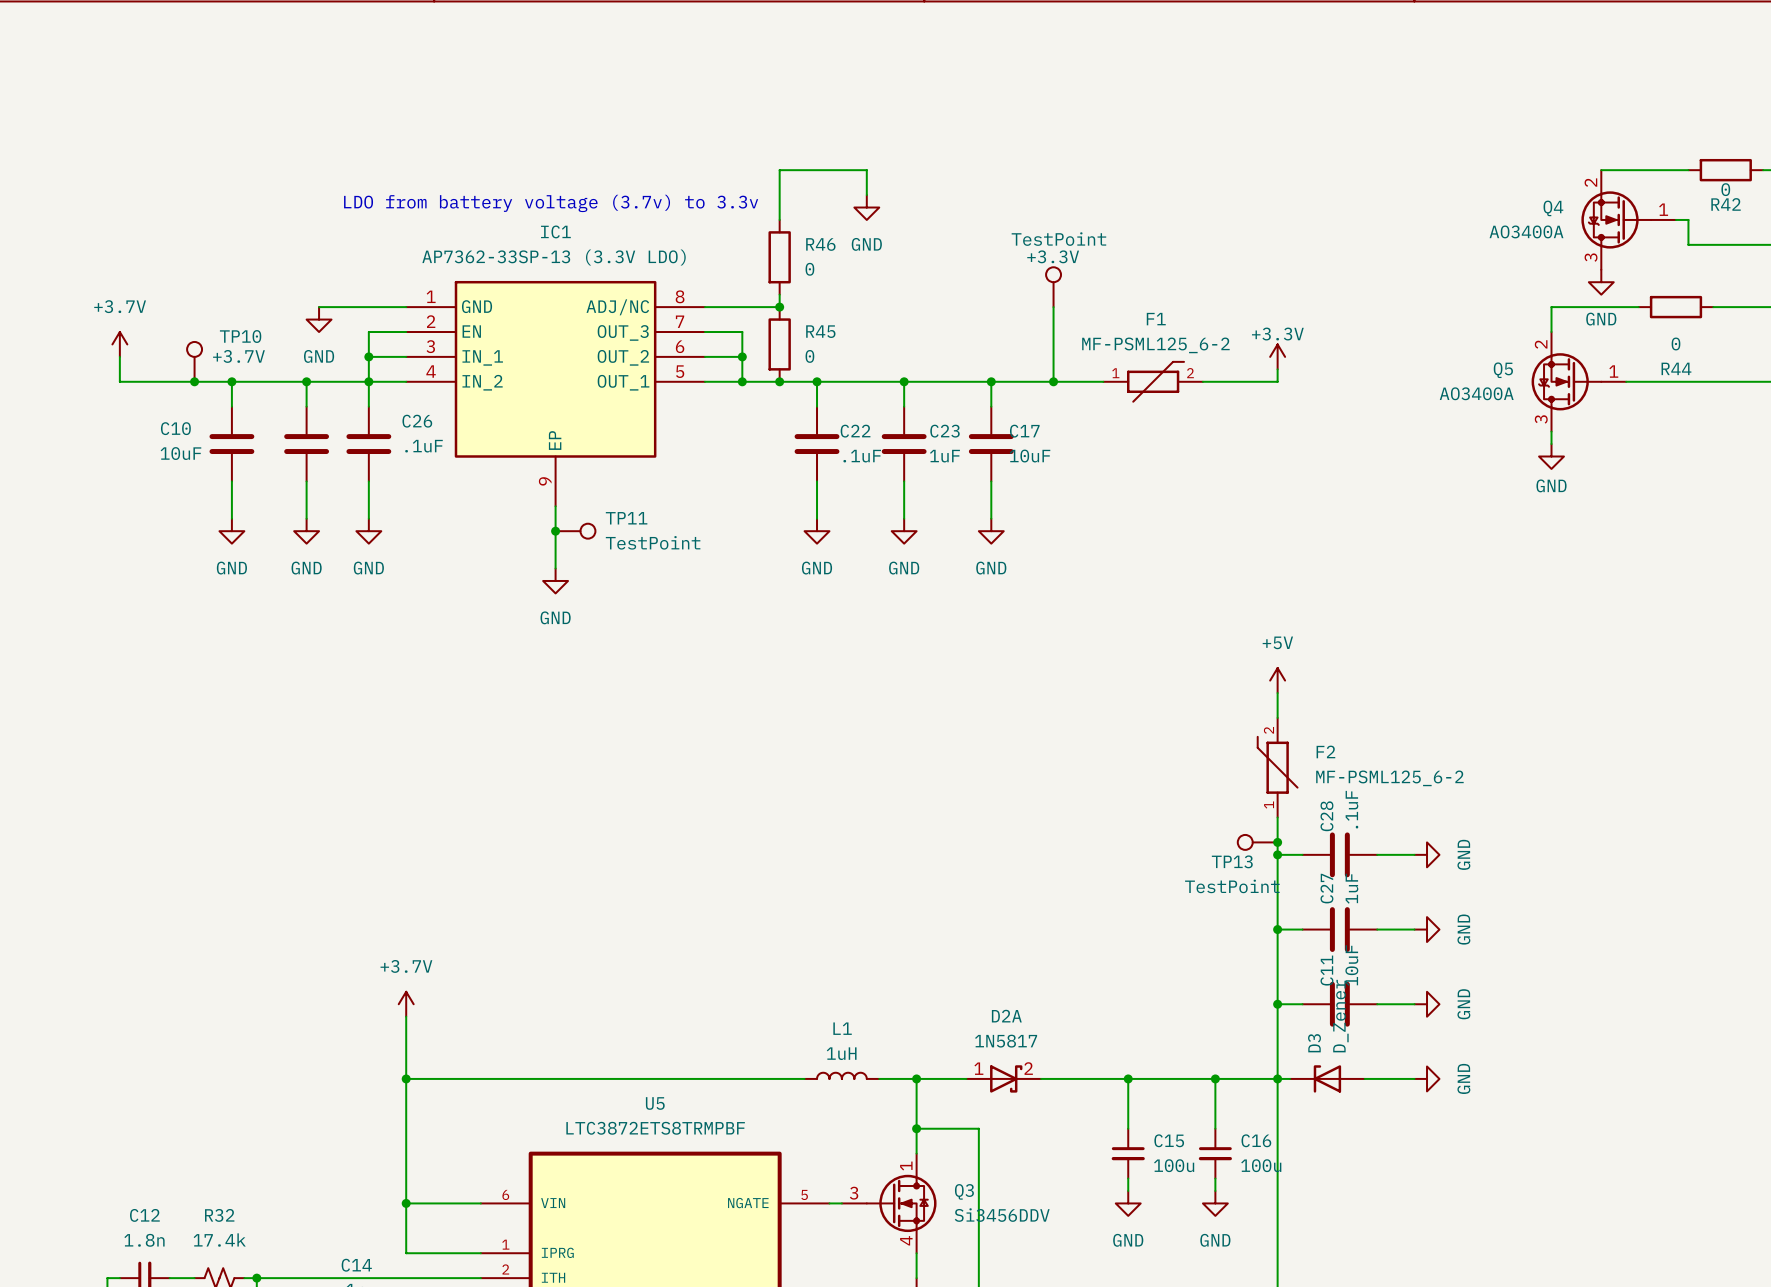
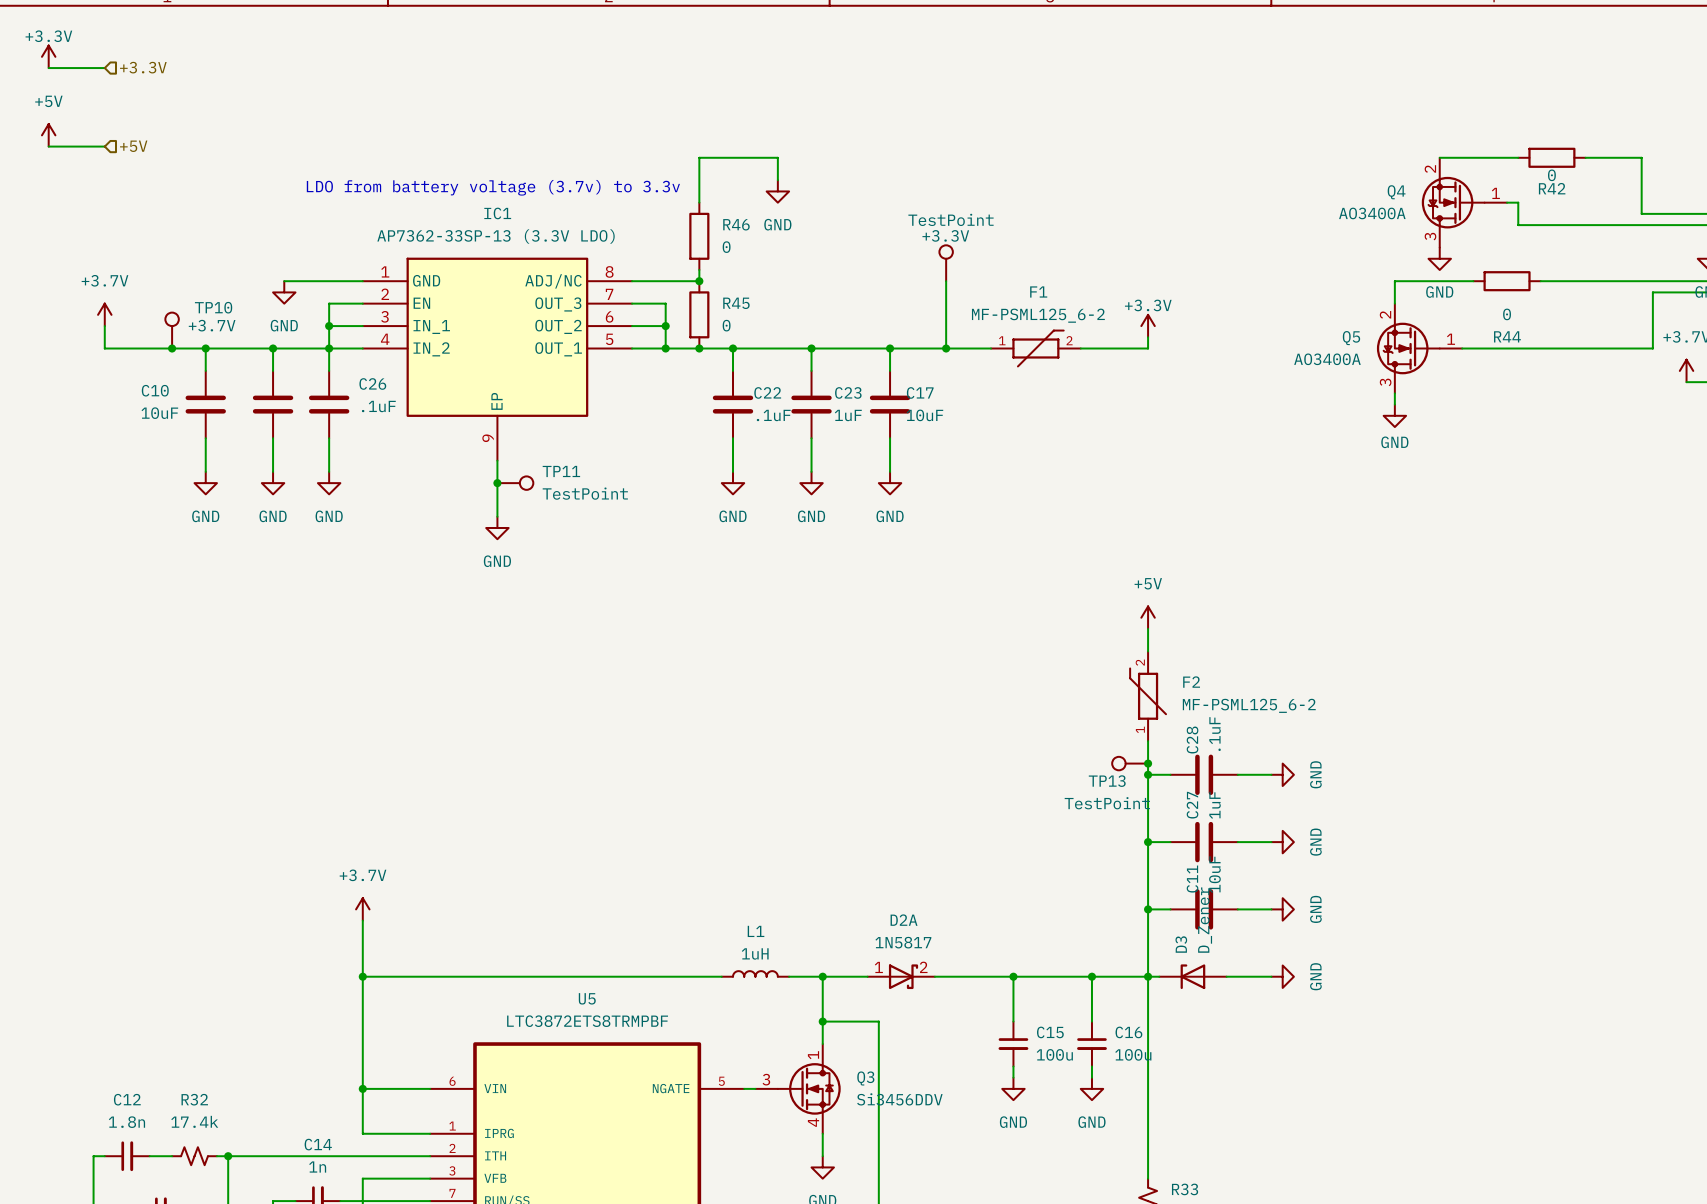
power symbol: none -> +3.3V (48, 56)
wire: none -> (48, 68) (104, 68)
hierarchical label: none -> +3.3V (143, 67)
power symbol: none -> +5V (48, 135)
wire: none -> (48, 146) (104, 146)
hierarchical label: none -> +5V (133, 146)

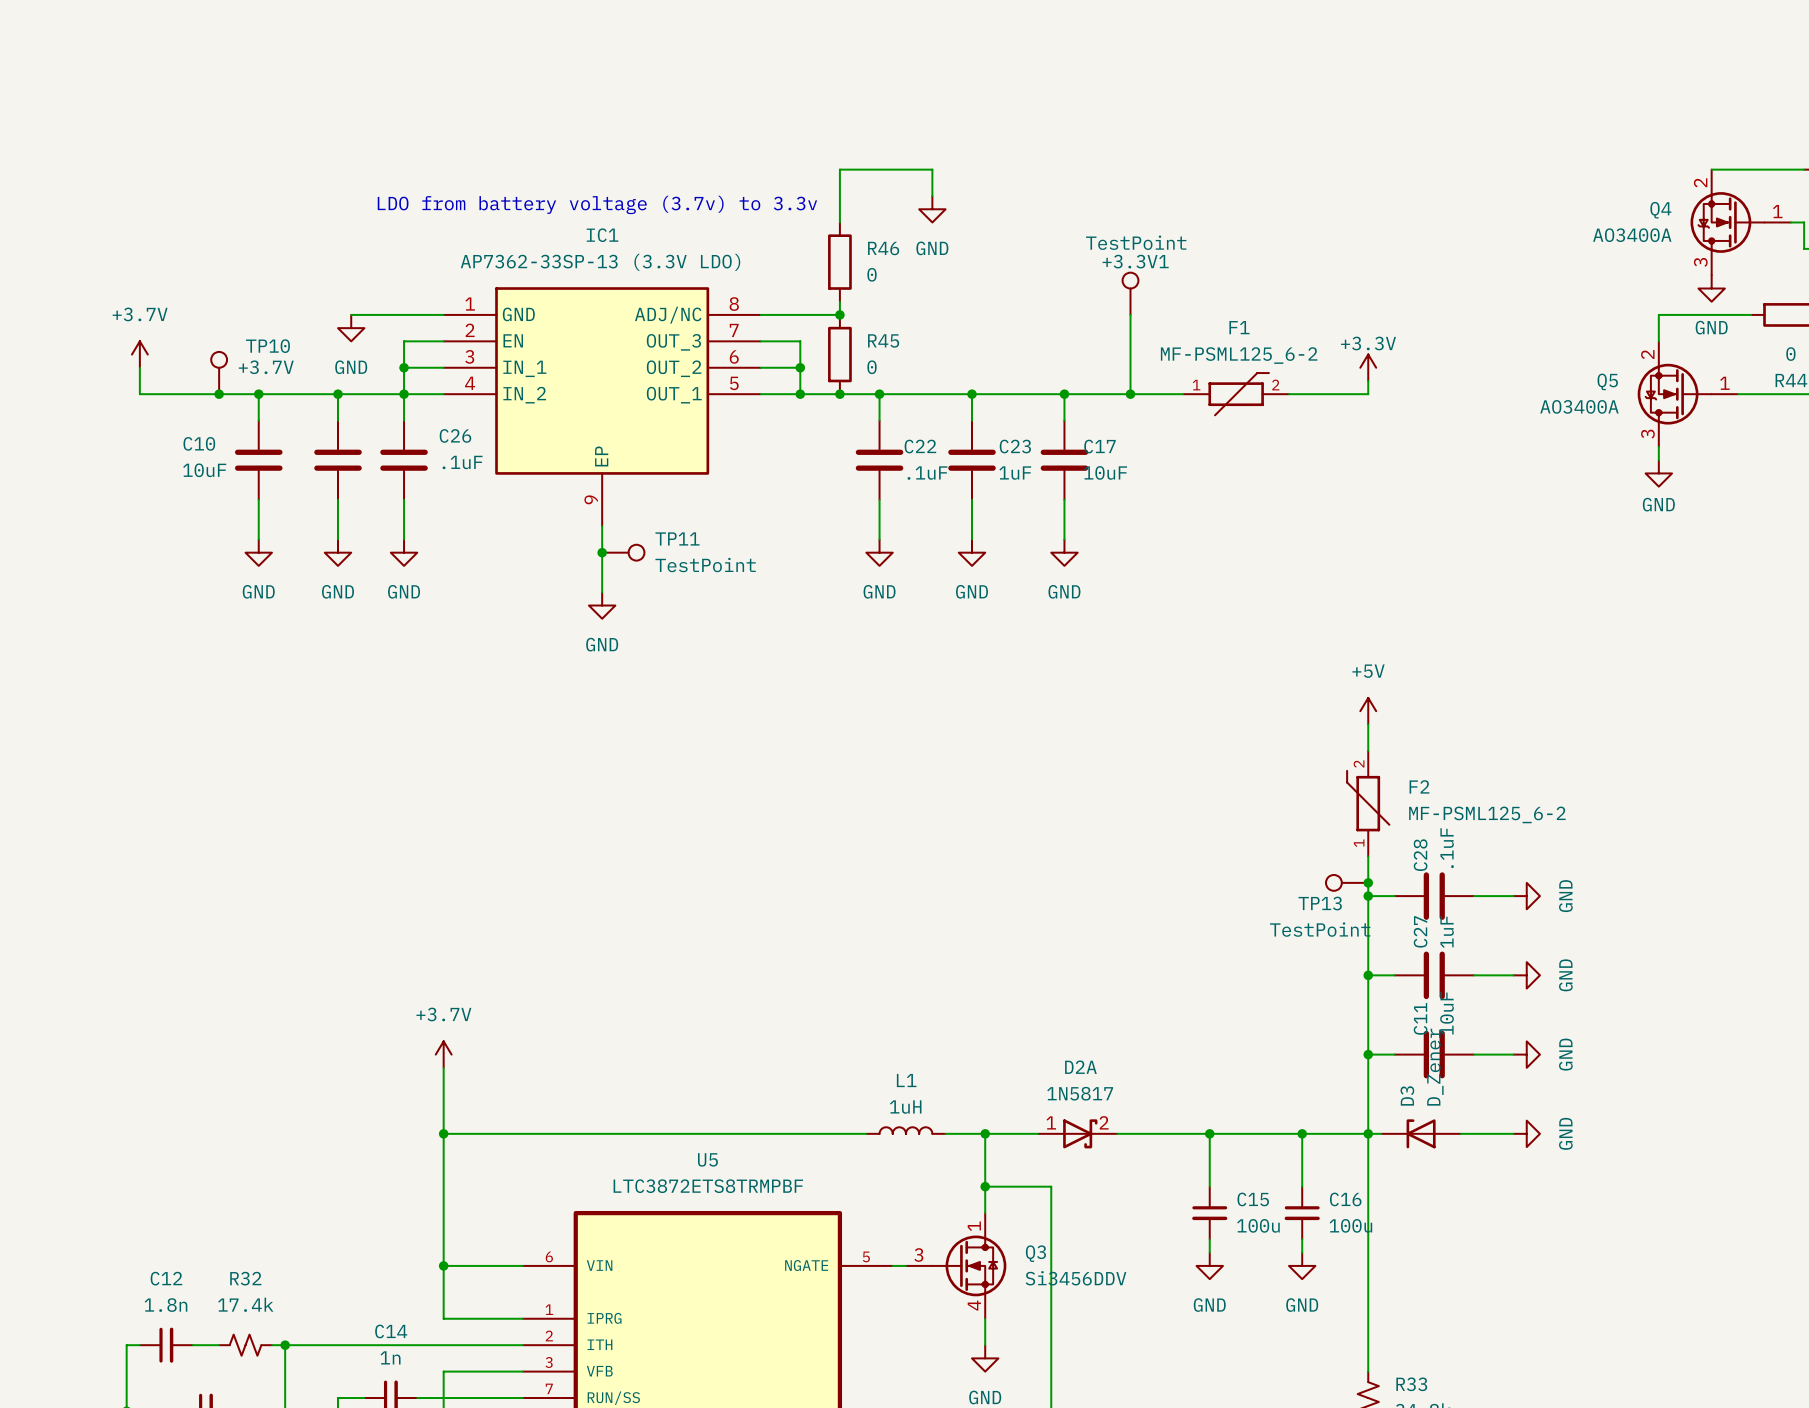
power symbol: +3.3V (48, 56) -> none
hierarchical label: +3.3V (143, 67) -> none
wire: (48, 68) (104, 68) -> none
power symbol: +5V (48, 135) -> none
wire: (48, 146) (104, 146) -> none
hierarchical label: +5V (133, 146) -> none
+3.3V name: +3.3V (945, 235) -> +3.3V1 (1135, 261)

